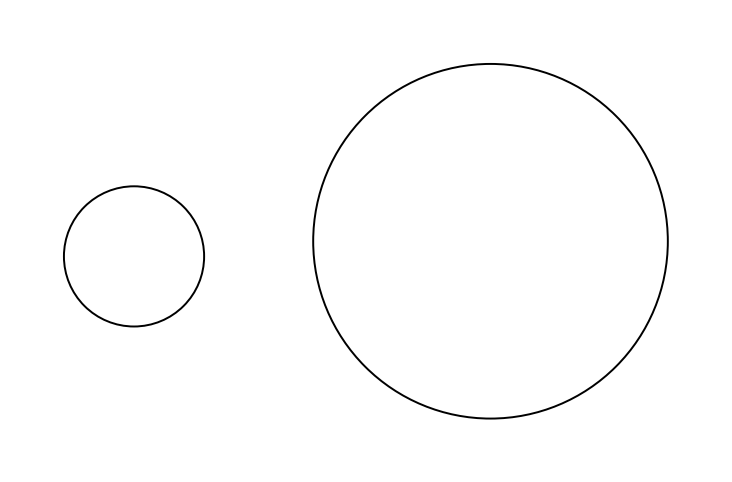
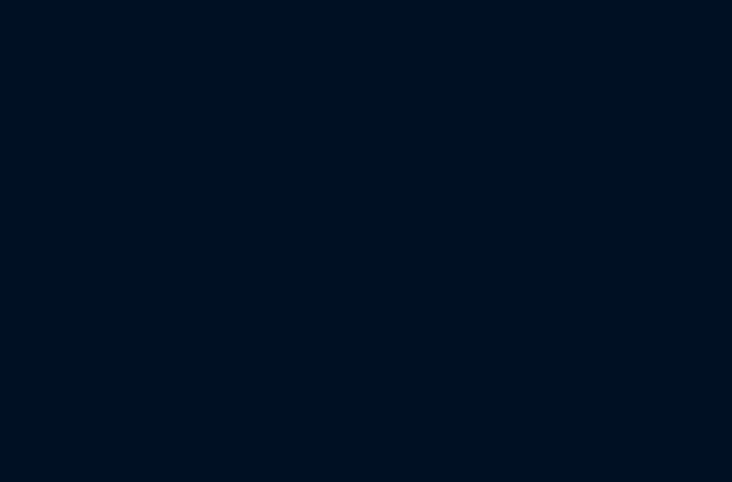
round board edge: [312, 63, 669, 419] -> none
round board edge: [63, 185, 205, 327] -> none

